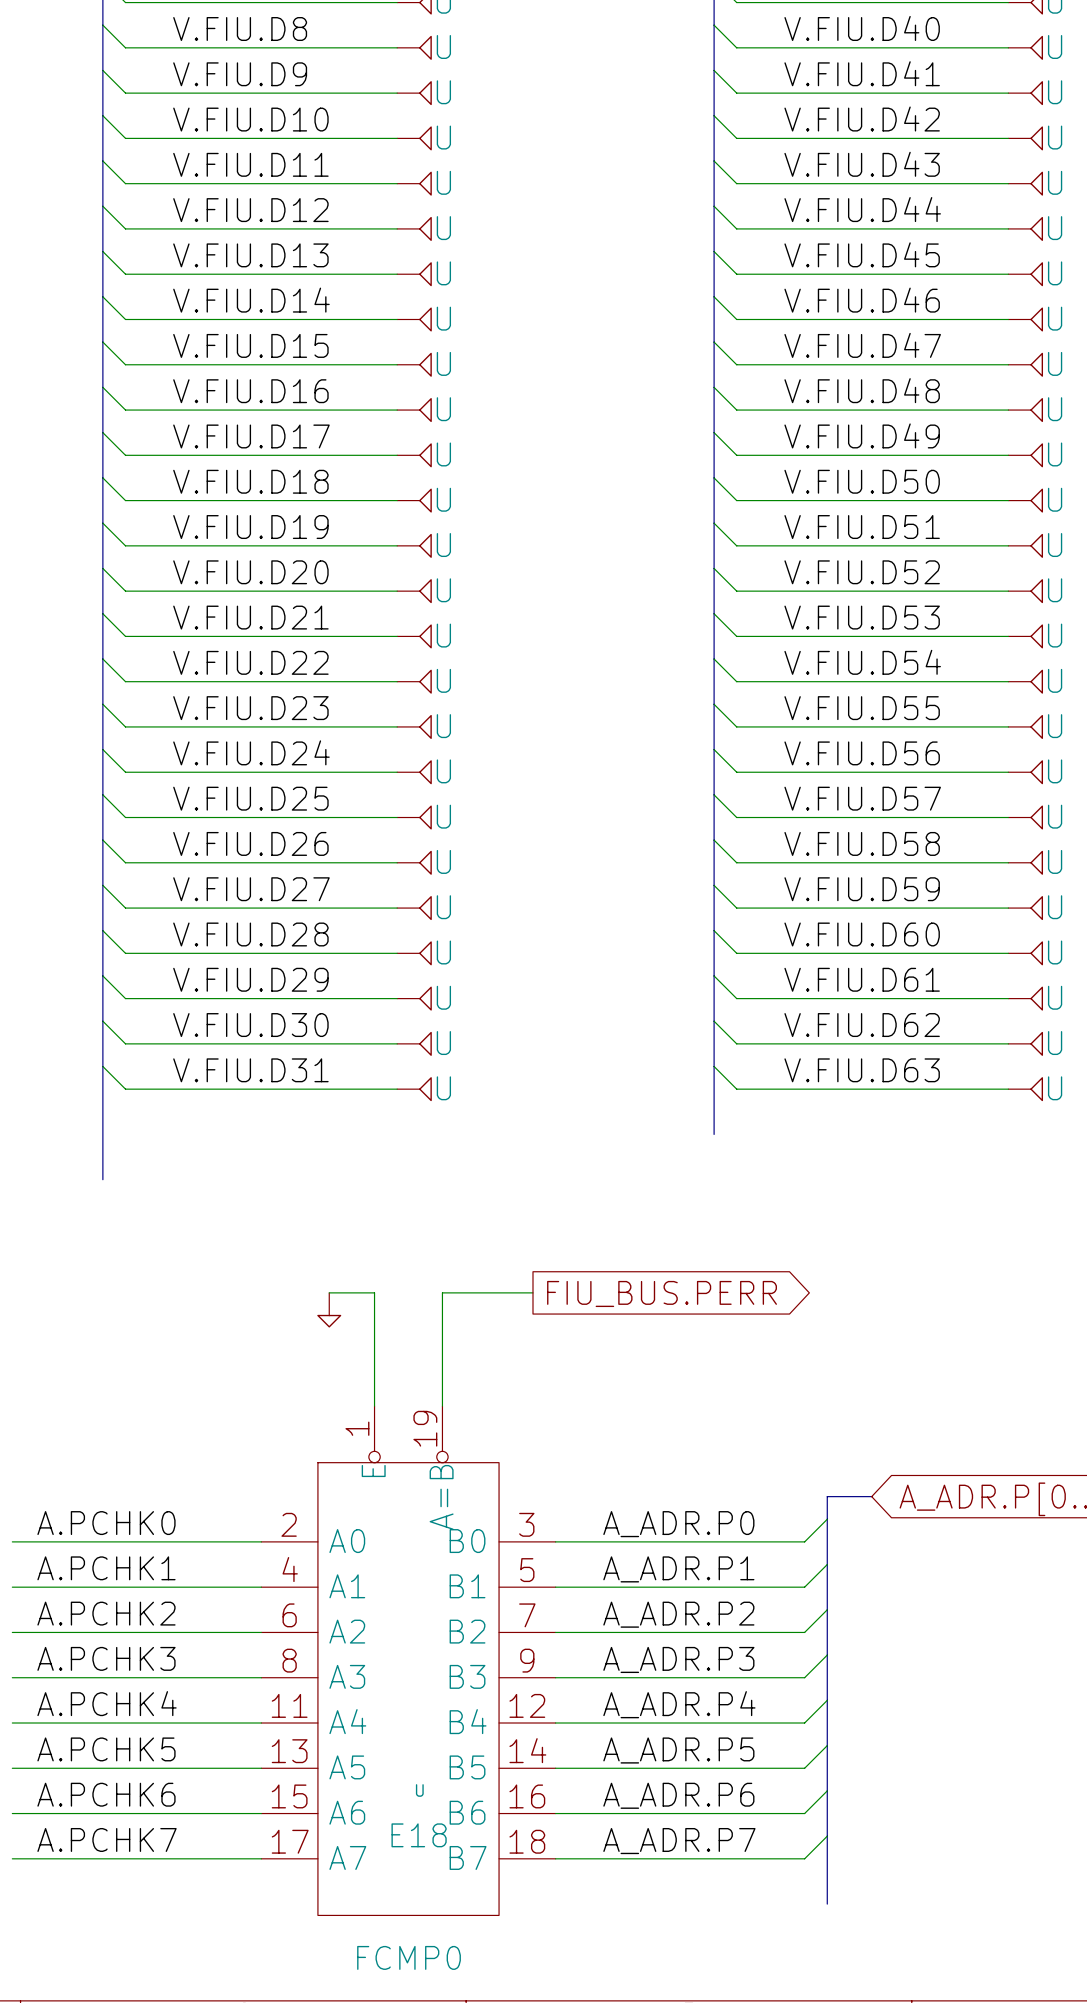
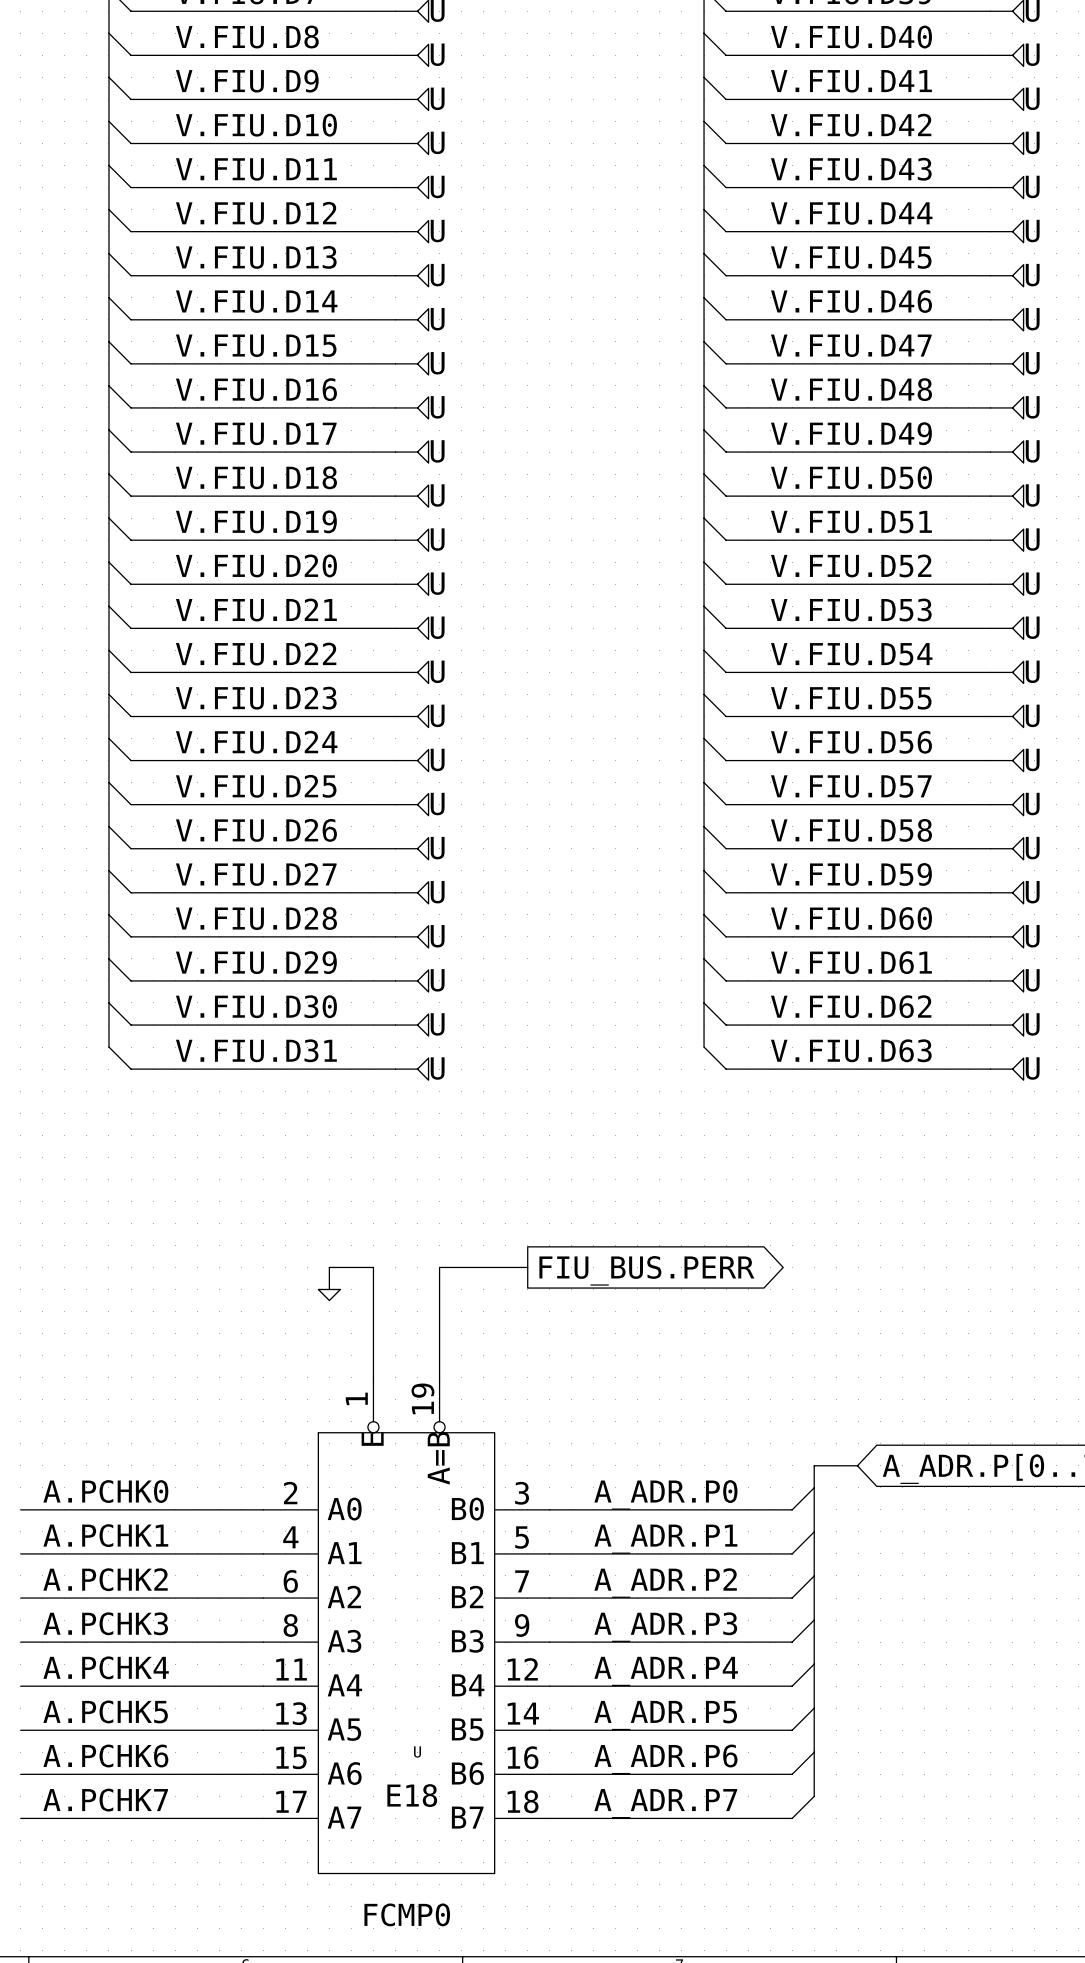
bus: (102, 1066) (102, 1179) -> none
bus: (714, 1066) (714, 1134) -> none
bus: (827, 1836) (827, 1904) -> none

